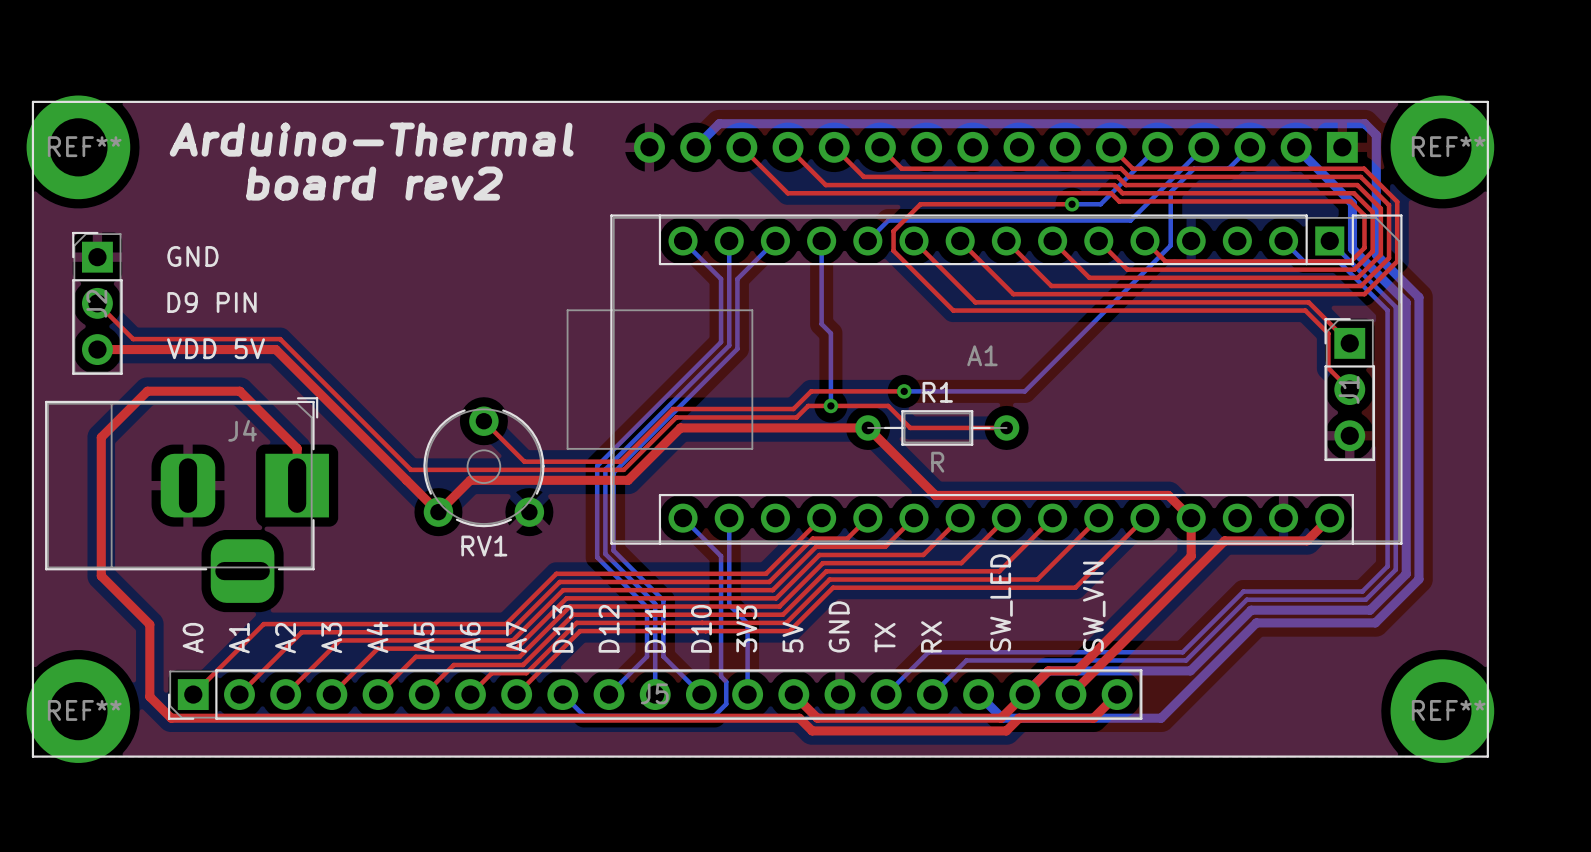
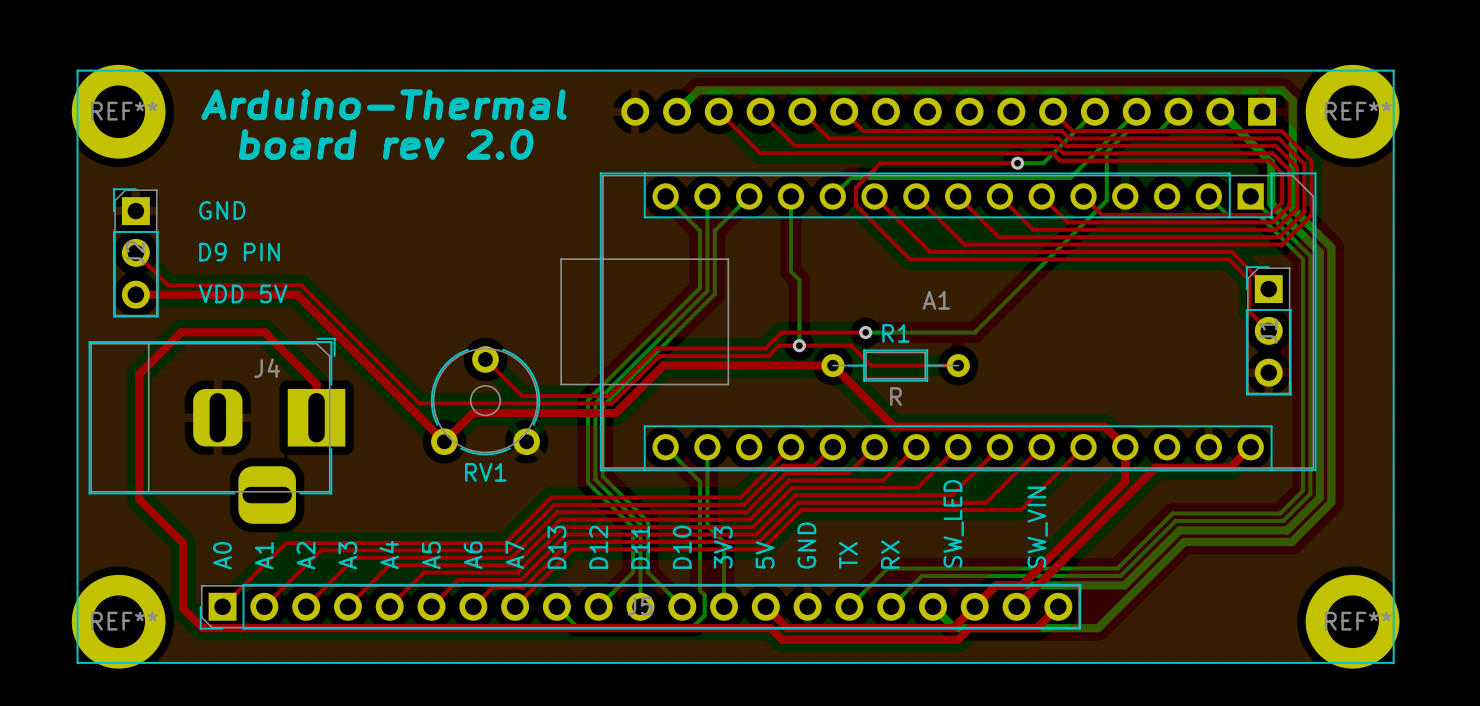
text: board rev2 (374, 183) -> board rev 2.0 (386, 144)

